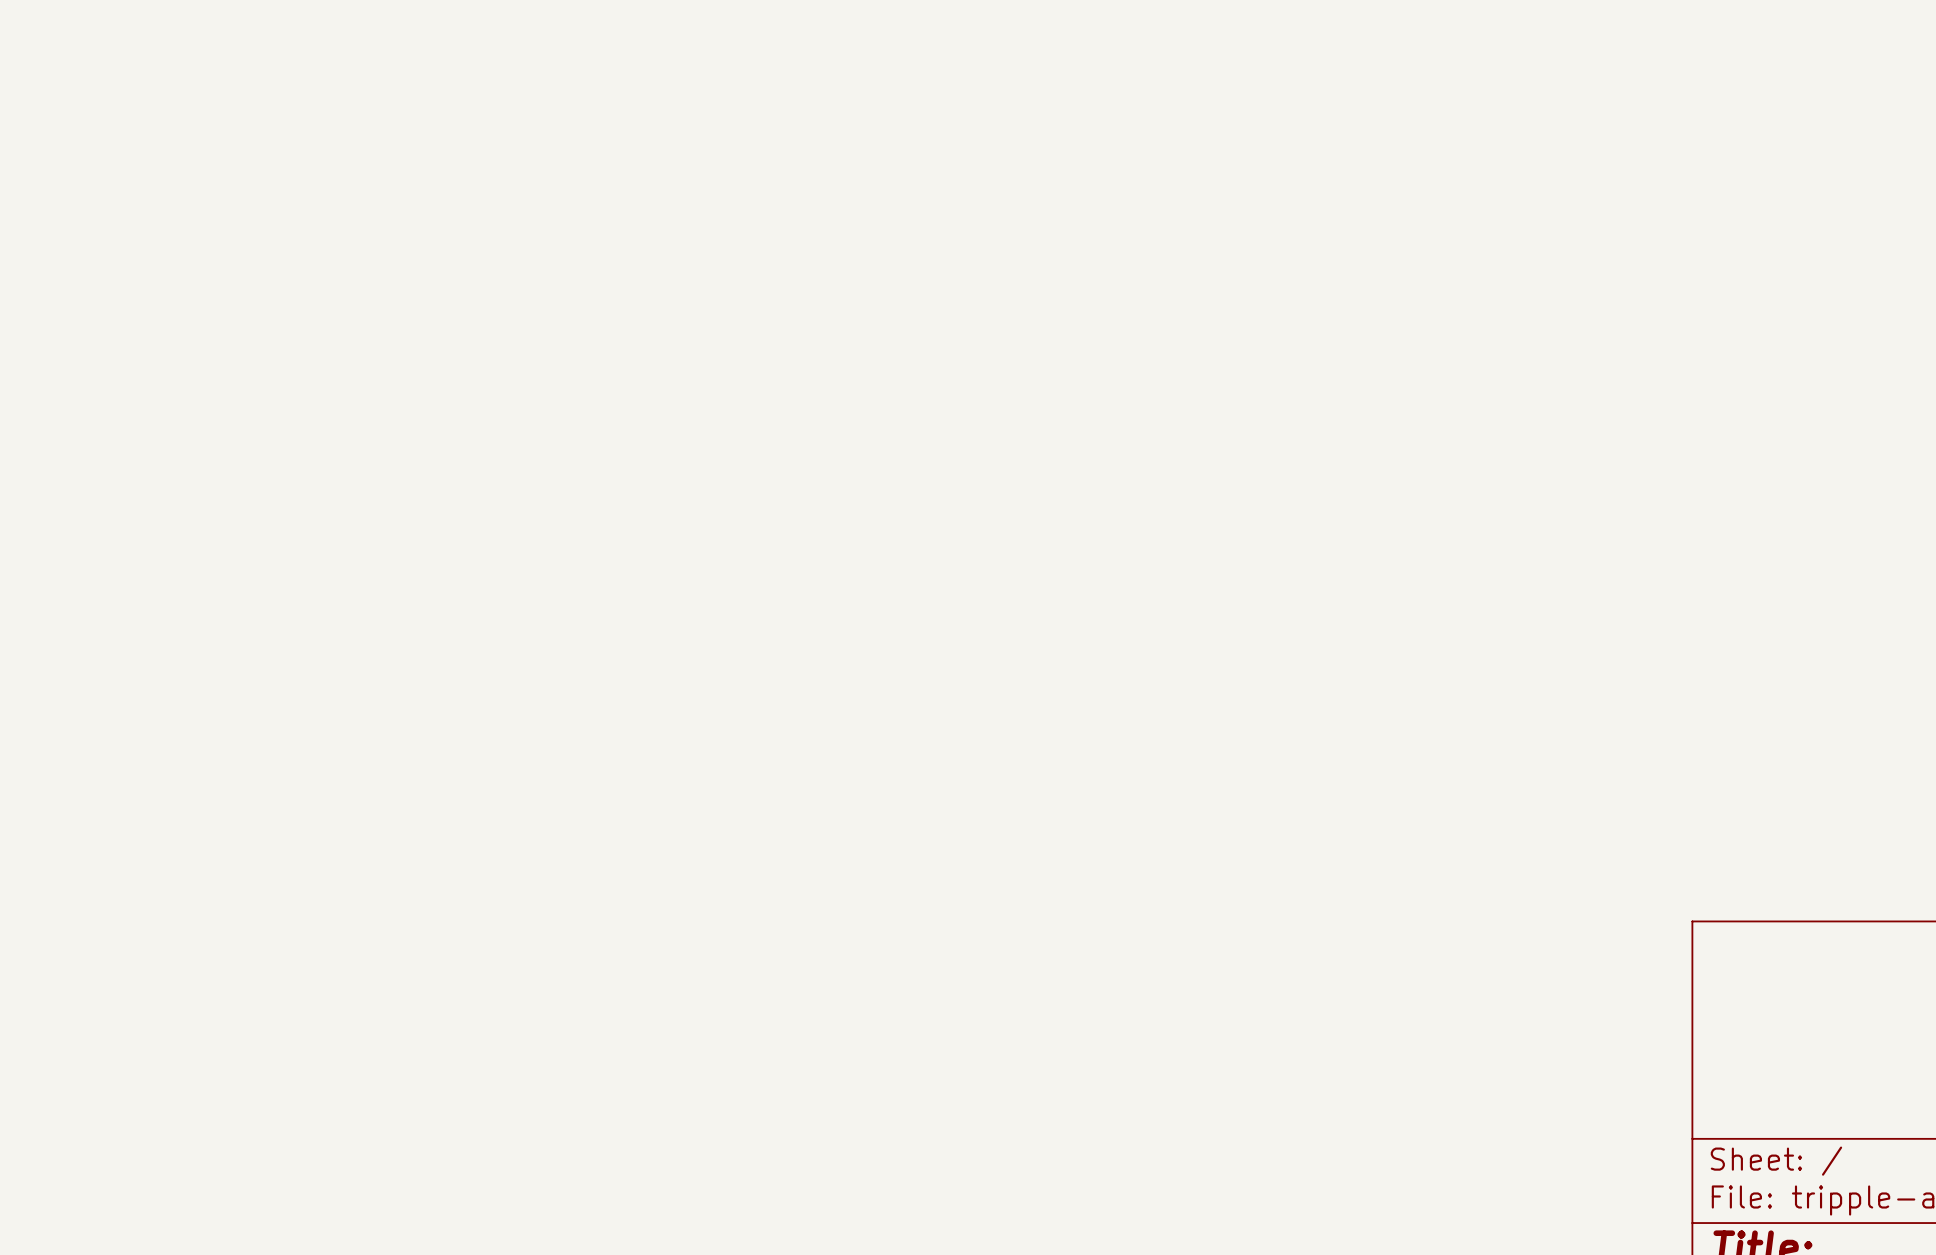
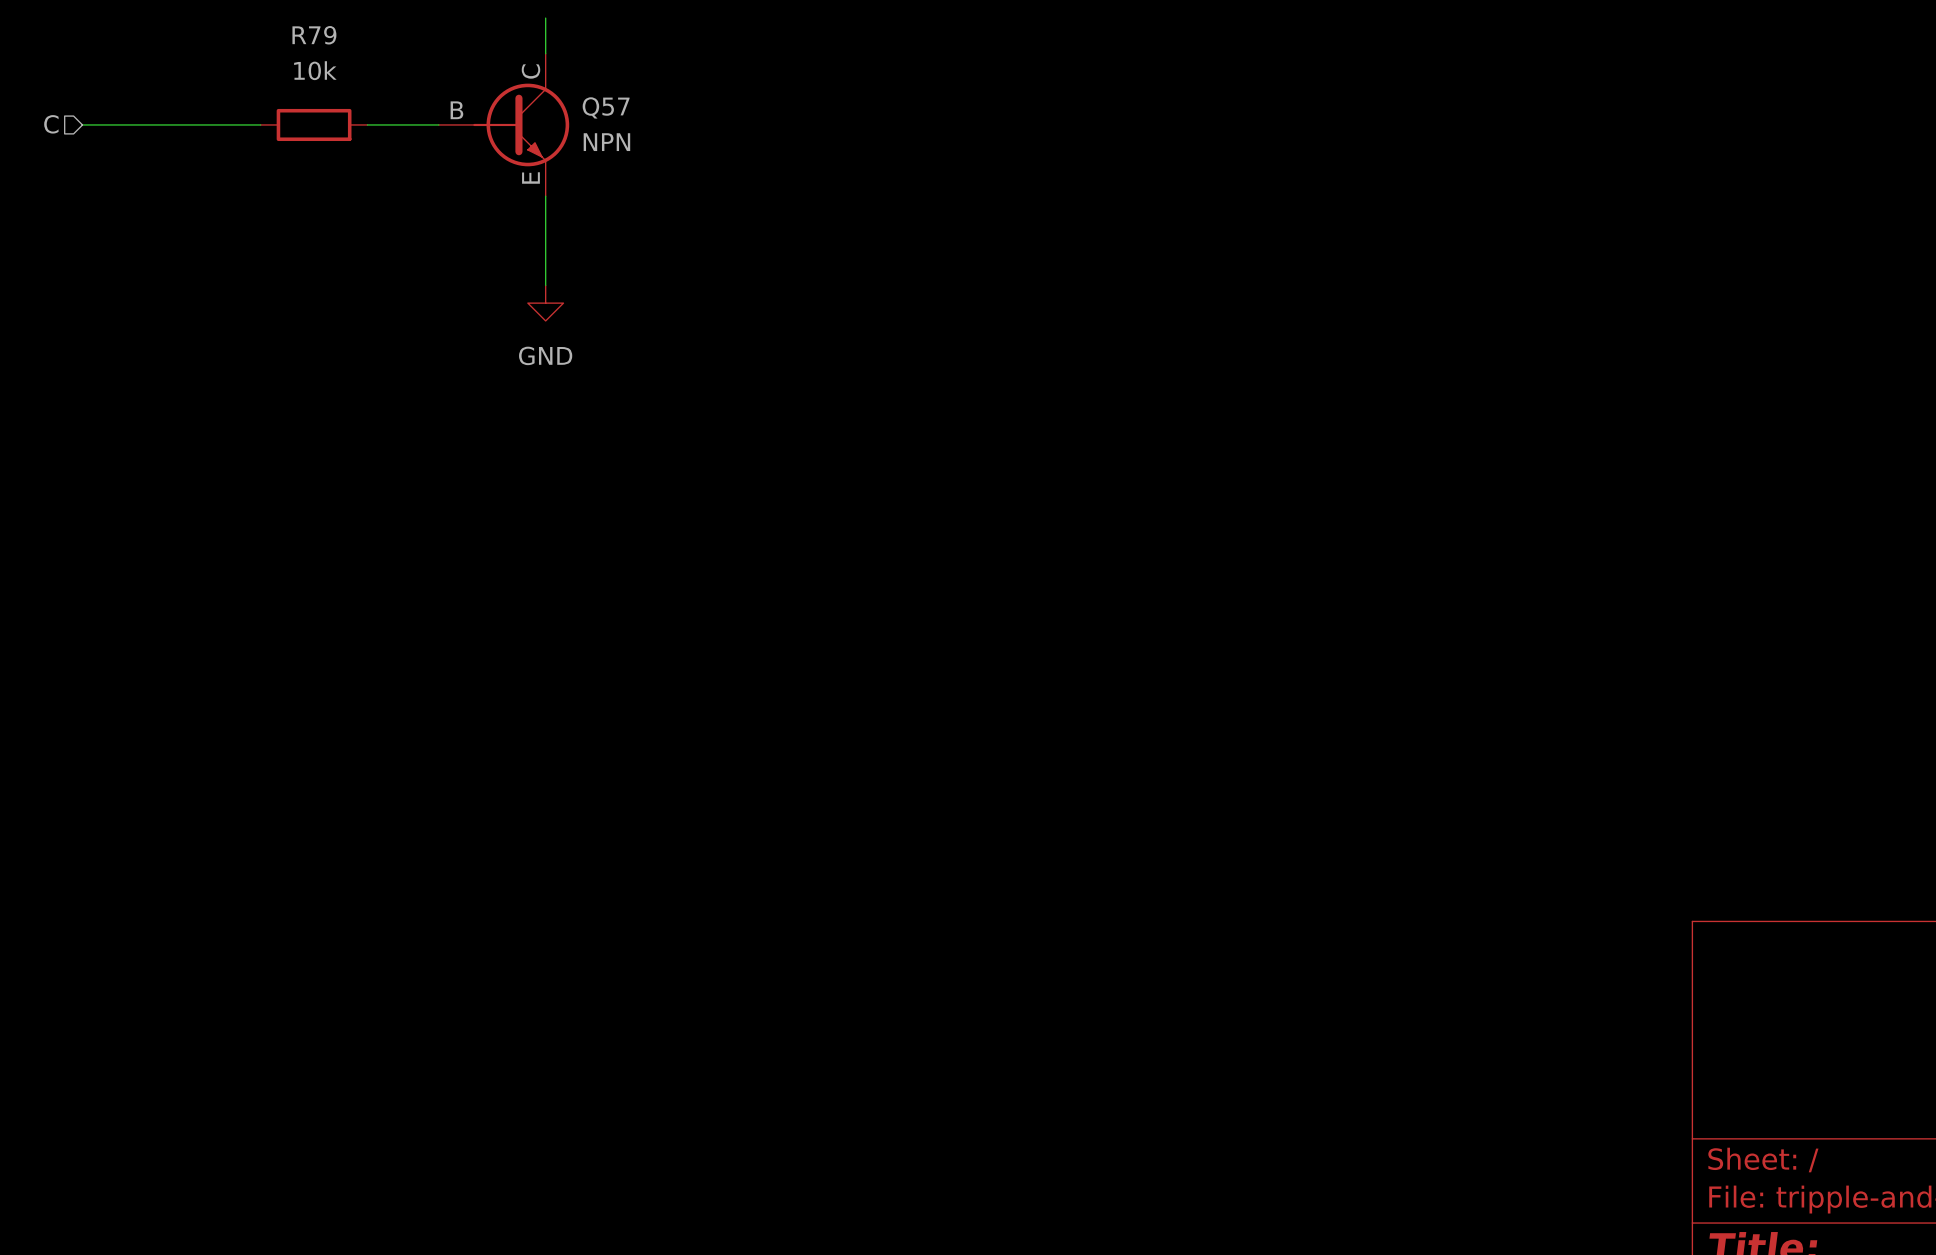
wire: none -> (545, 18) (545, 53)
hierarchical label: none -> C (51, 124)
wire: none -> (82, 124) (260, 124)
R79: none -> 10k (314, 124)
wire: none -> (367, 124) (438, 124)
Q57: none -> NPN (503, 124)
wire: none -> (545, 196) (545, 285)
power symbol: none -> GND (545, 303)

